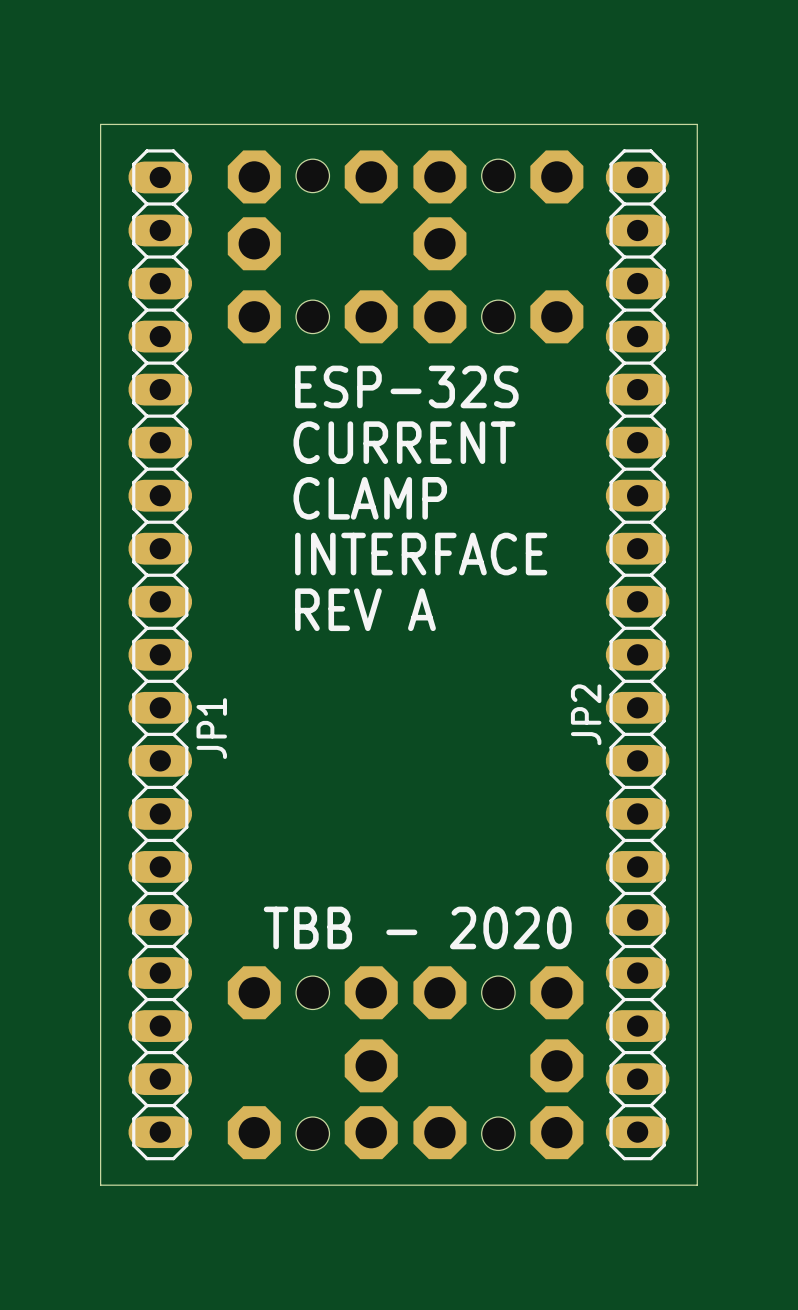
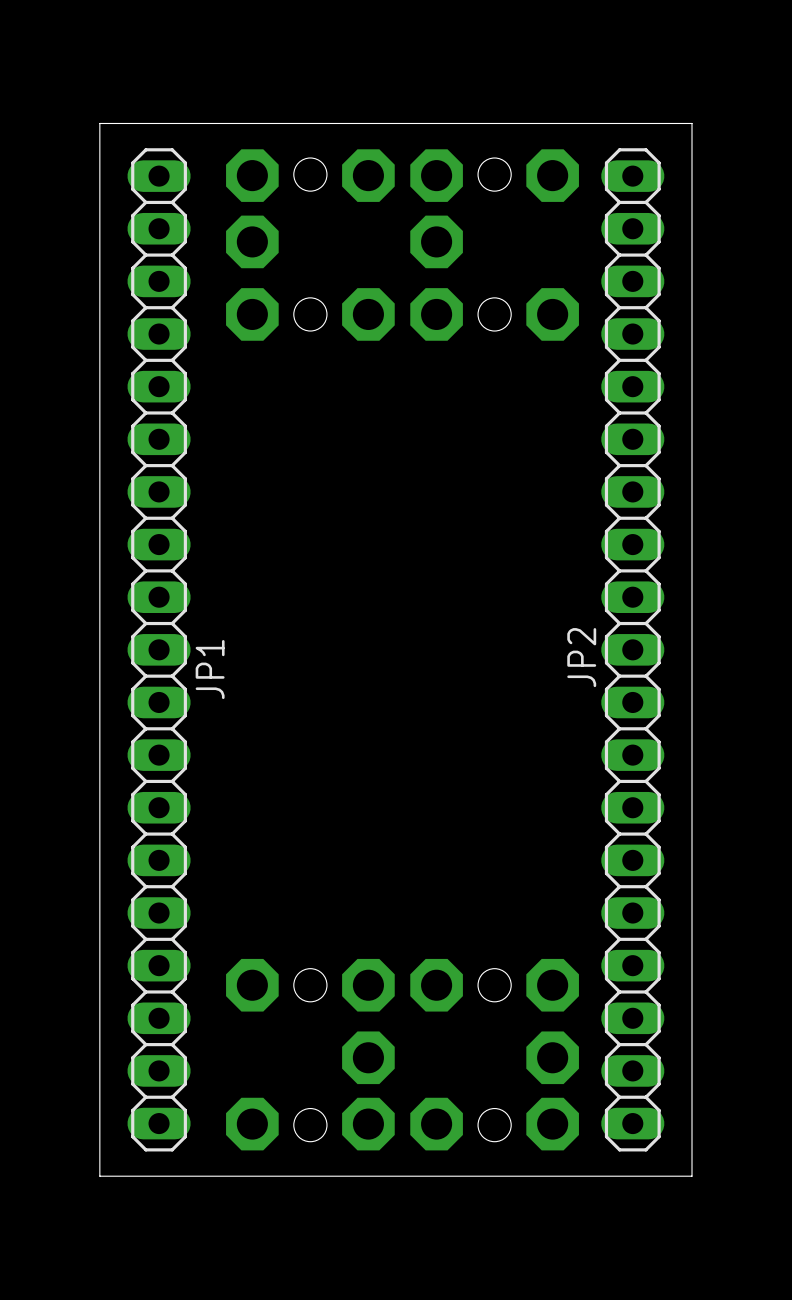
text: ESP-32S (406, 386) -> none
text: CURRENT (404, 442) -> none
text: CLAMP (370, 498) -> none
text: INTERFACE (421, 554) -> none
text: REV A (365, 609) -> none
JP2 name position: JP2 (586, 714) -> JP2 (581, 657)
JP1 name position: JP1 (211, 728) -> JP1 (210, 669)
text: TBB - 2020 (417, 927) -> none

